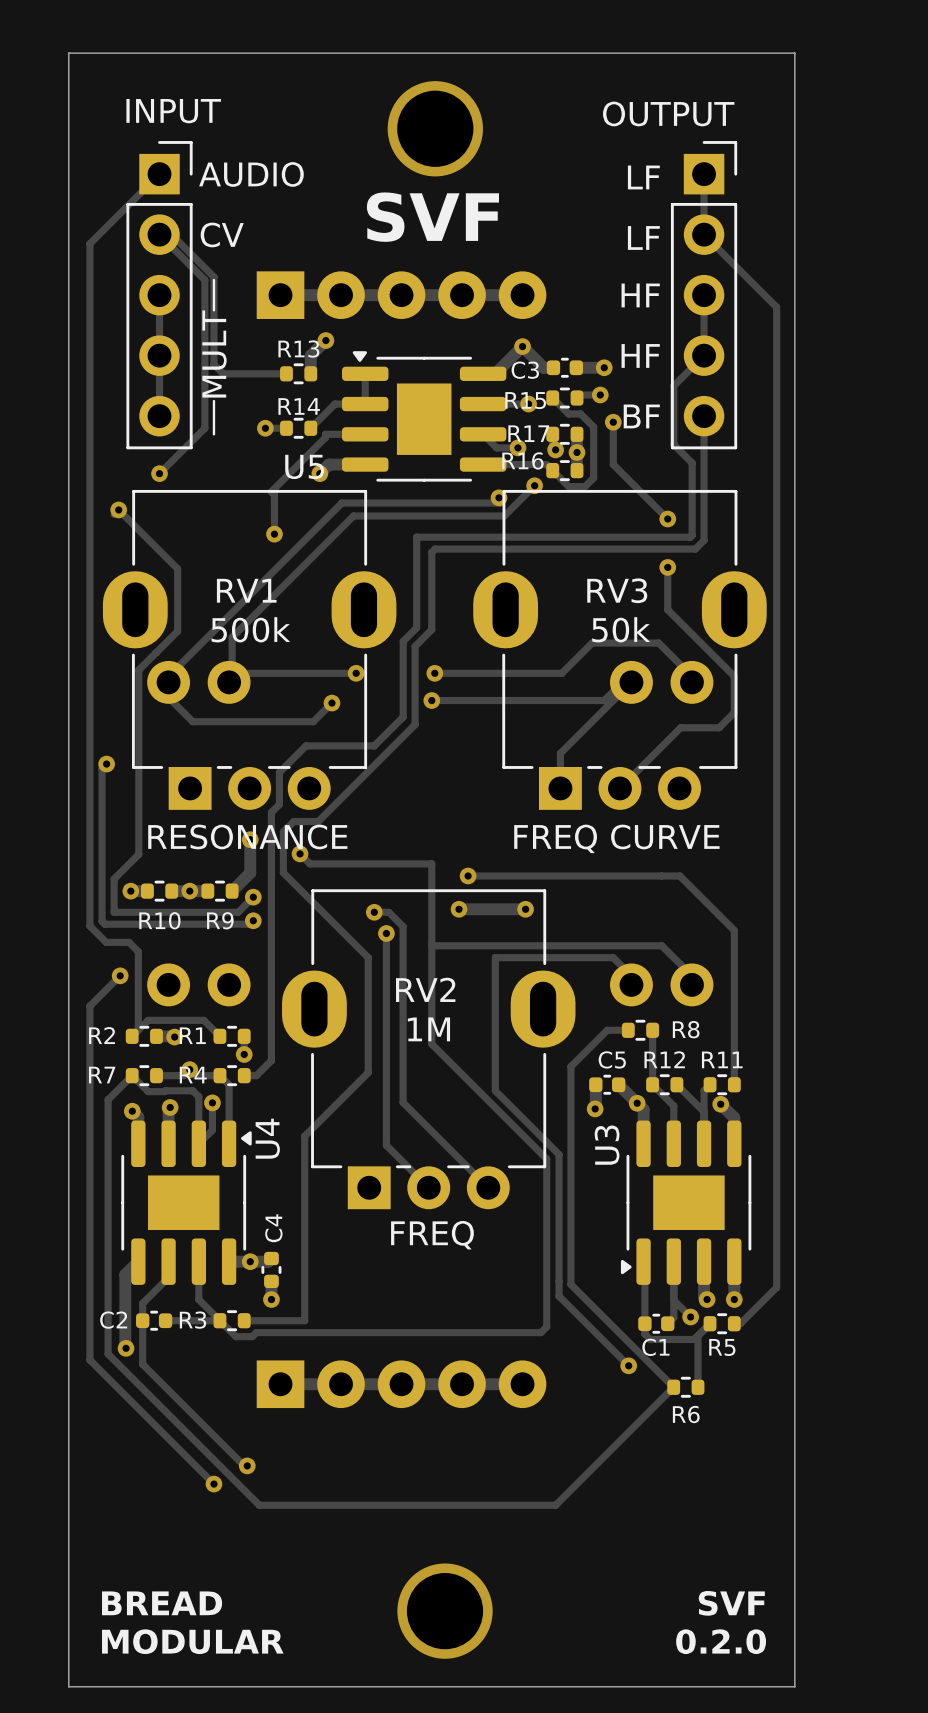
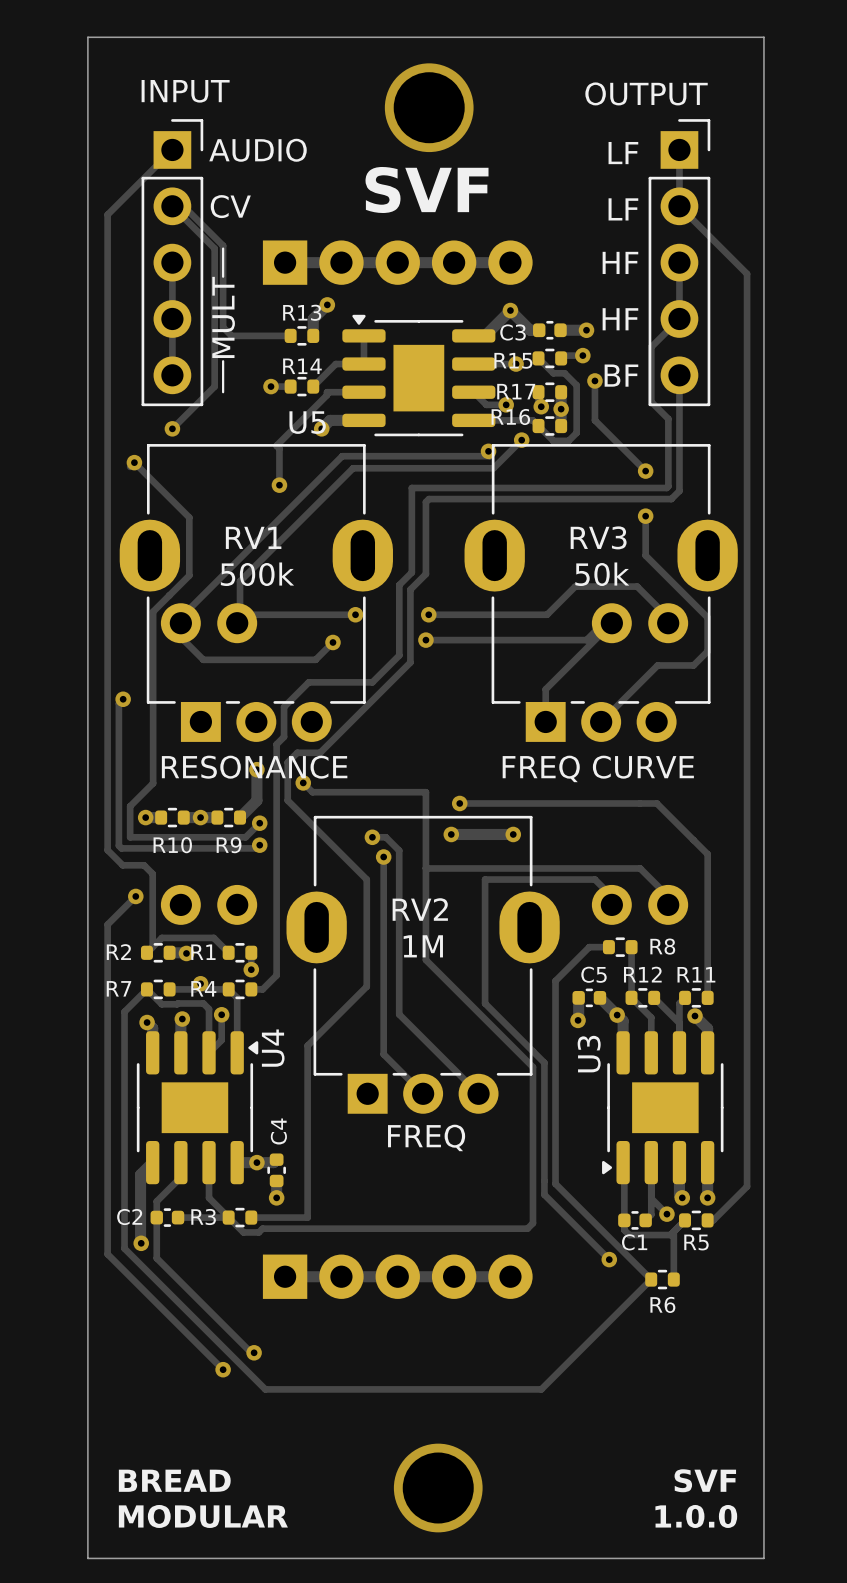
text: 0.2.0 (721, 1641) -> 1.0.0 (696, 1516)

